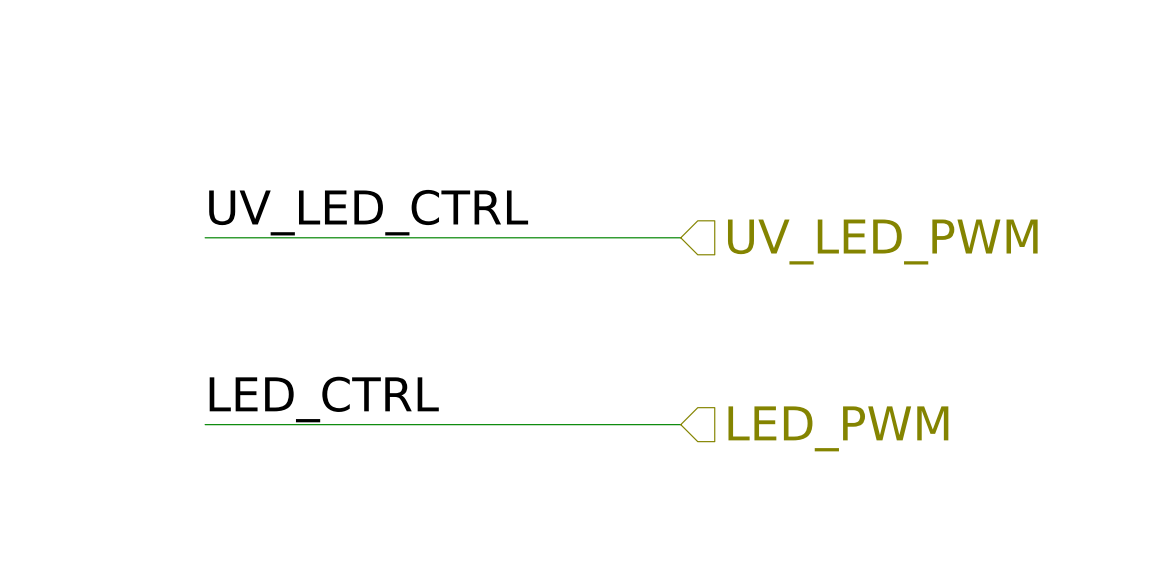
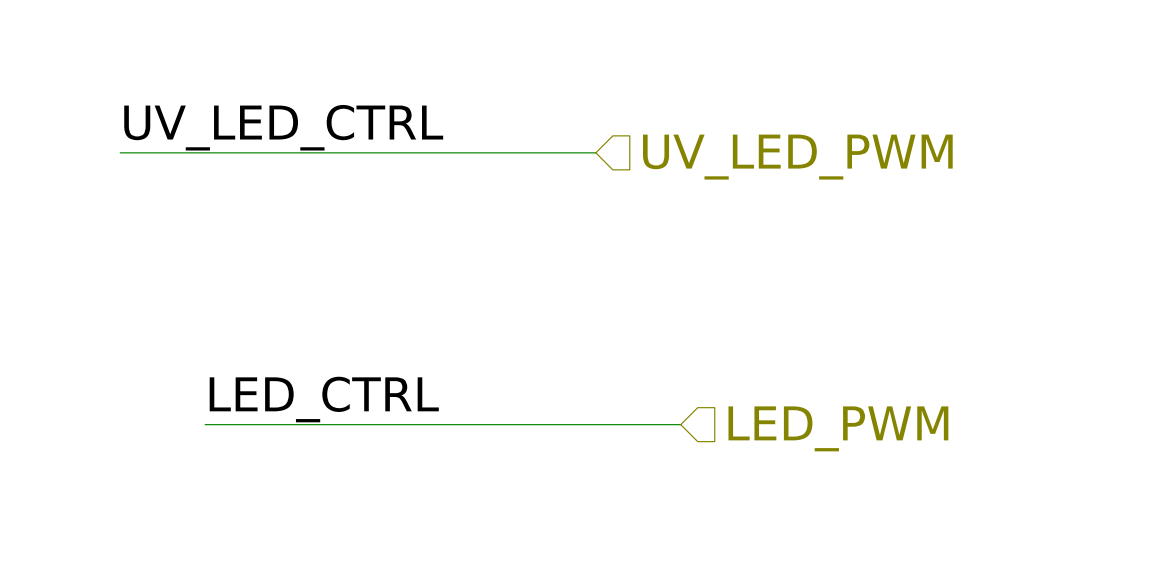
label position: UV_LED_CTRL (368, 212) -> UV_LED_CTRL (283, 127)
wire: (205, 237) (680, 237) -> (120, 152) (595, 152)
hierarchical label position: UV_LED_PWM (882, 242) -> UV_LED_PWM (797, 157)

